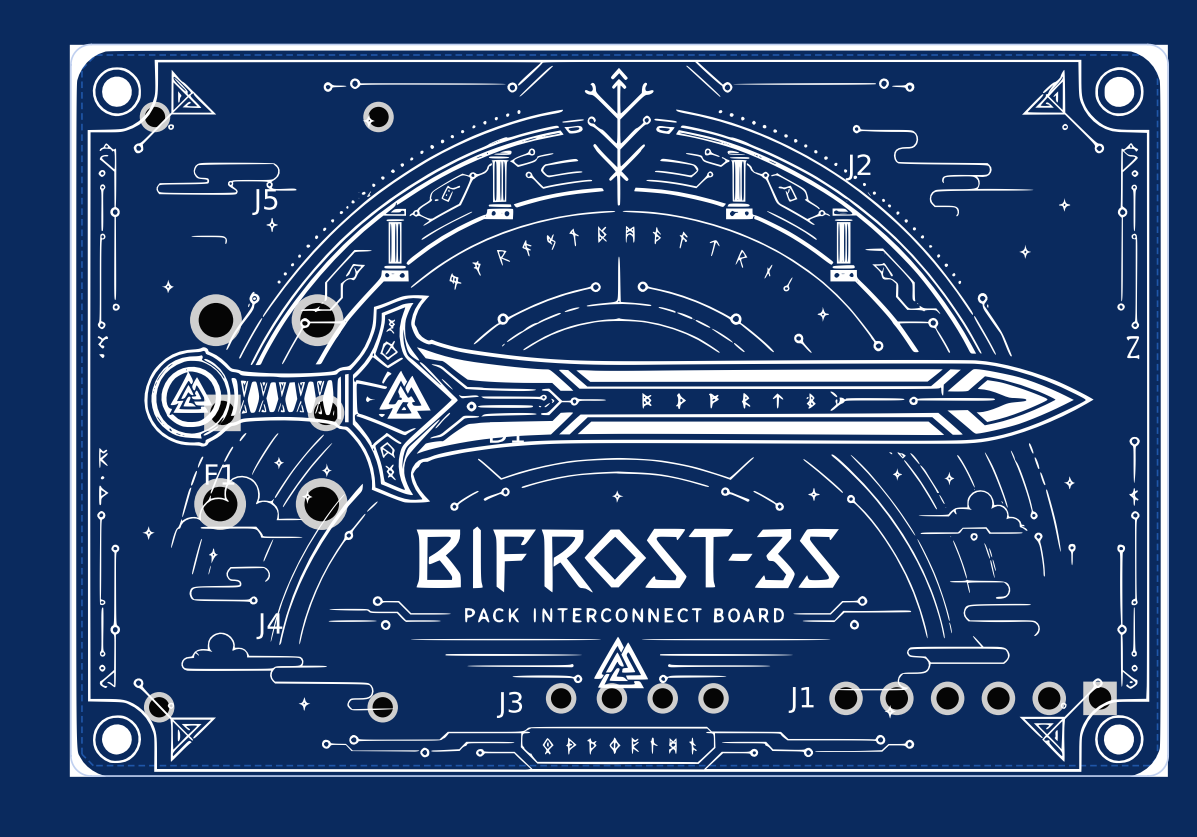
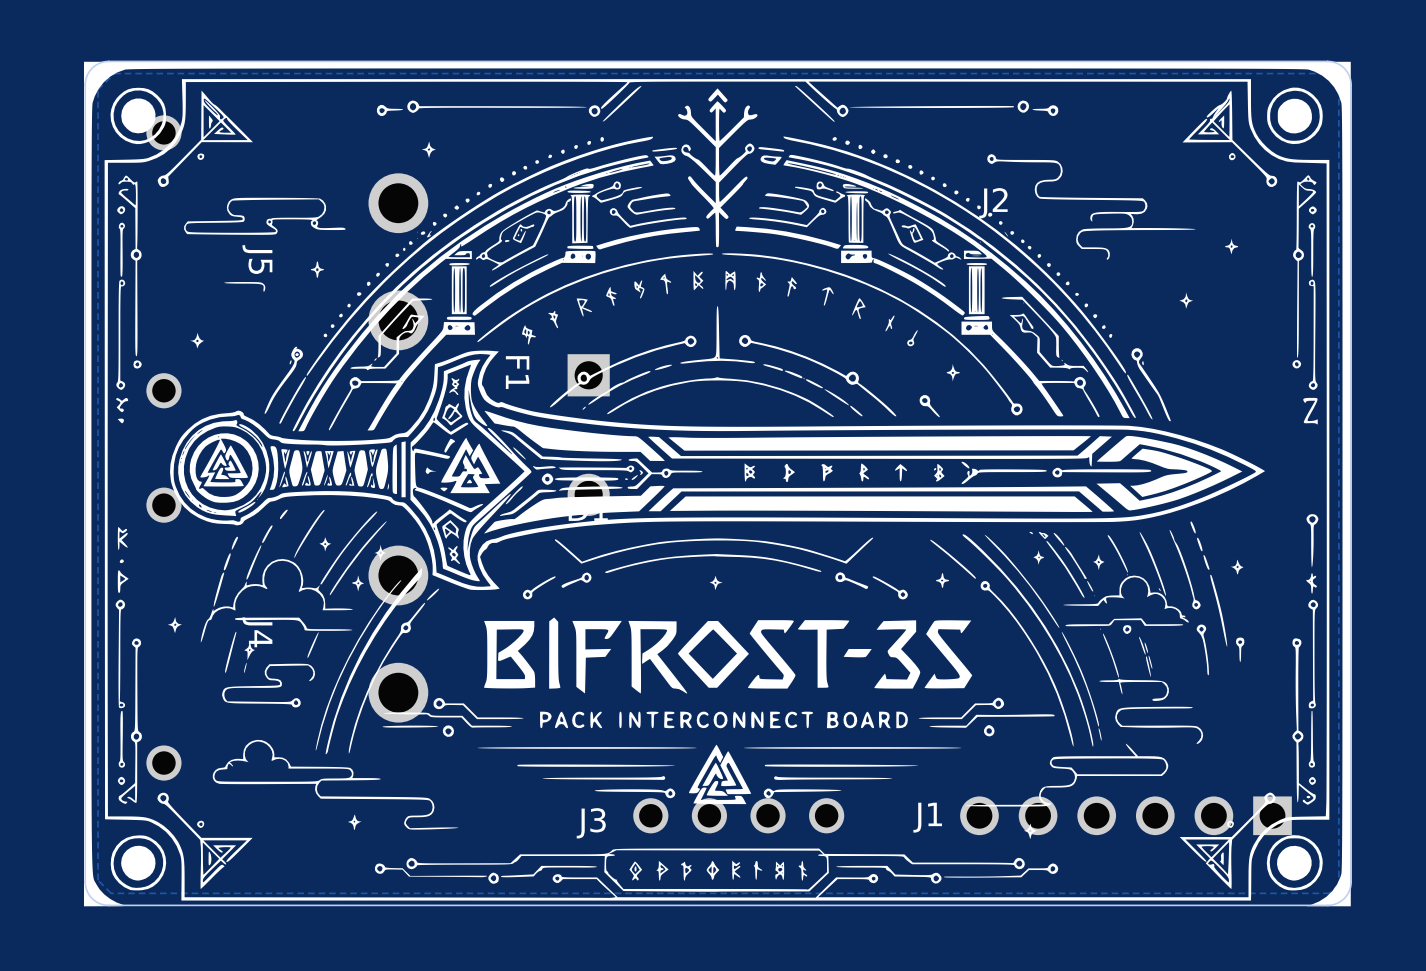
J5 rotation: 0° (266, 223) -> 90° counterclockwise (287, 261)
F1 rotation: 0° (274, 412) -> 90° clockwise (588, 435)
F1 position: (274, 412) -> (588, 435)
J4 rotation: 0° (270, 600) -> 90° clockwise (287, 634)

